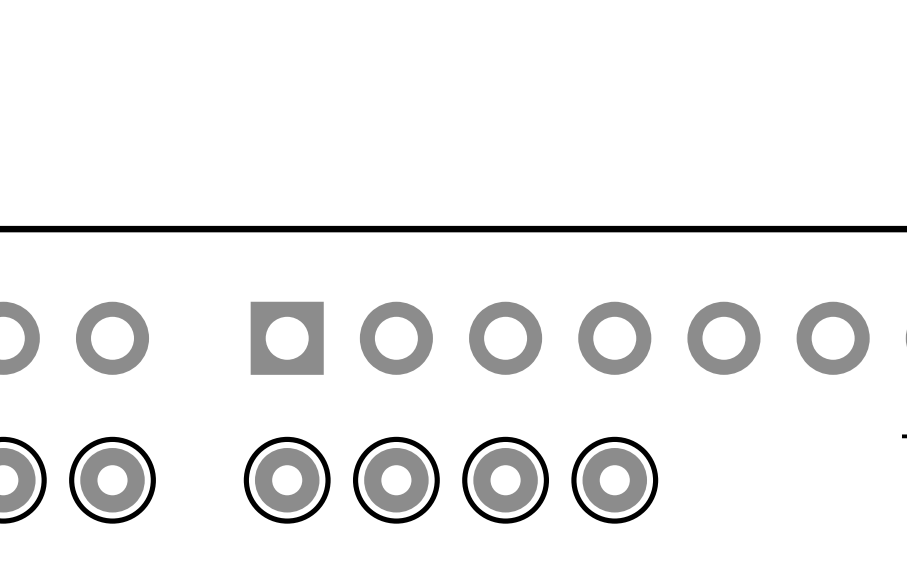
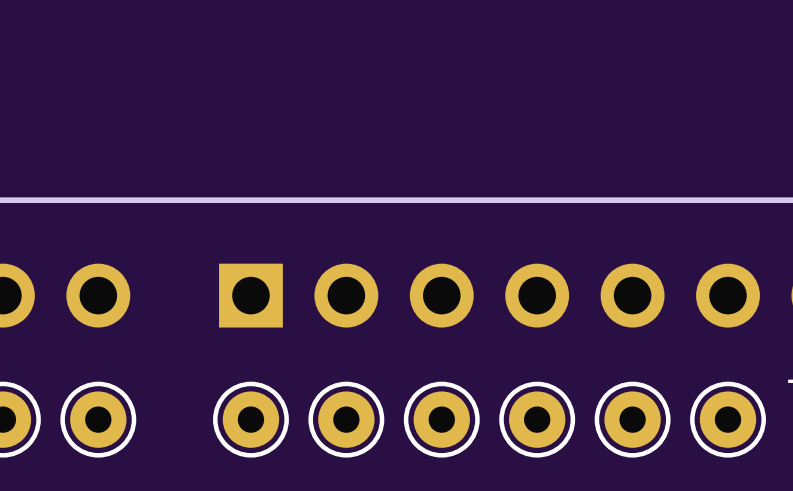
part: none -> (632, 419)
part: none -> (728, 419)

